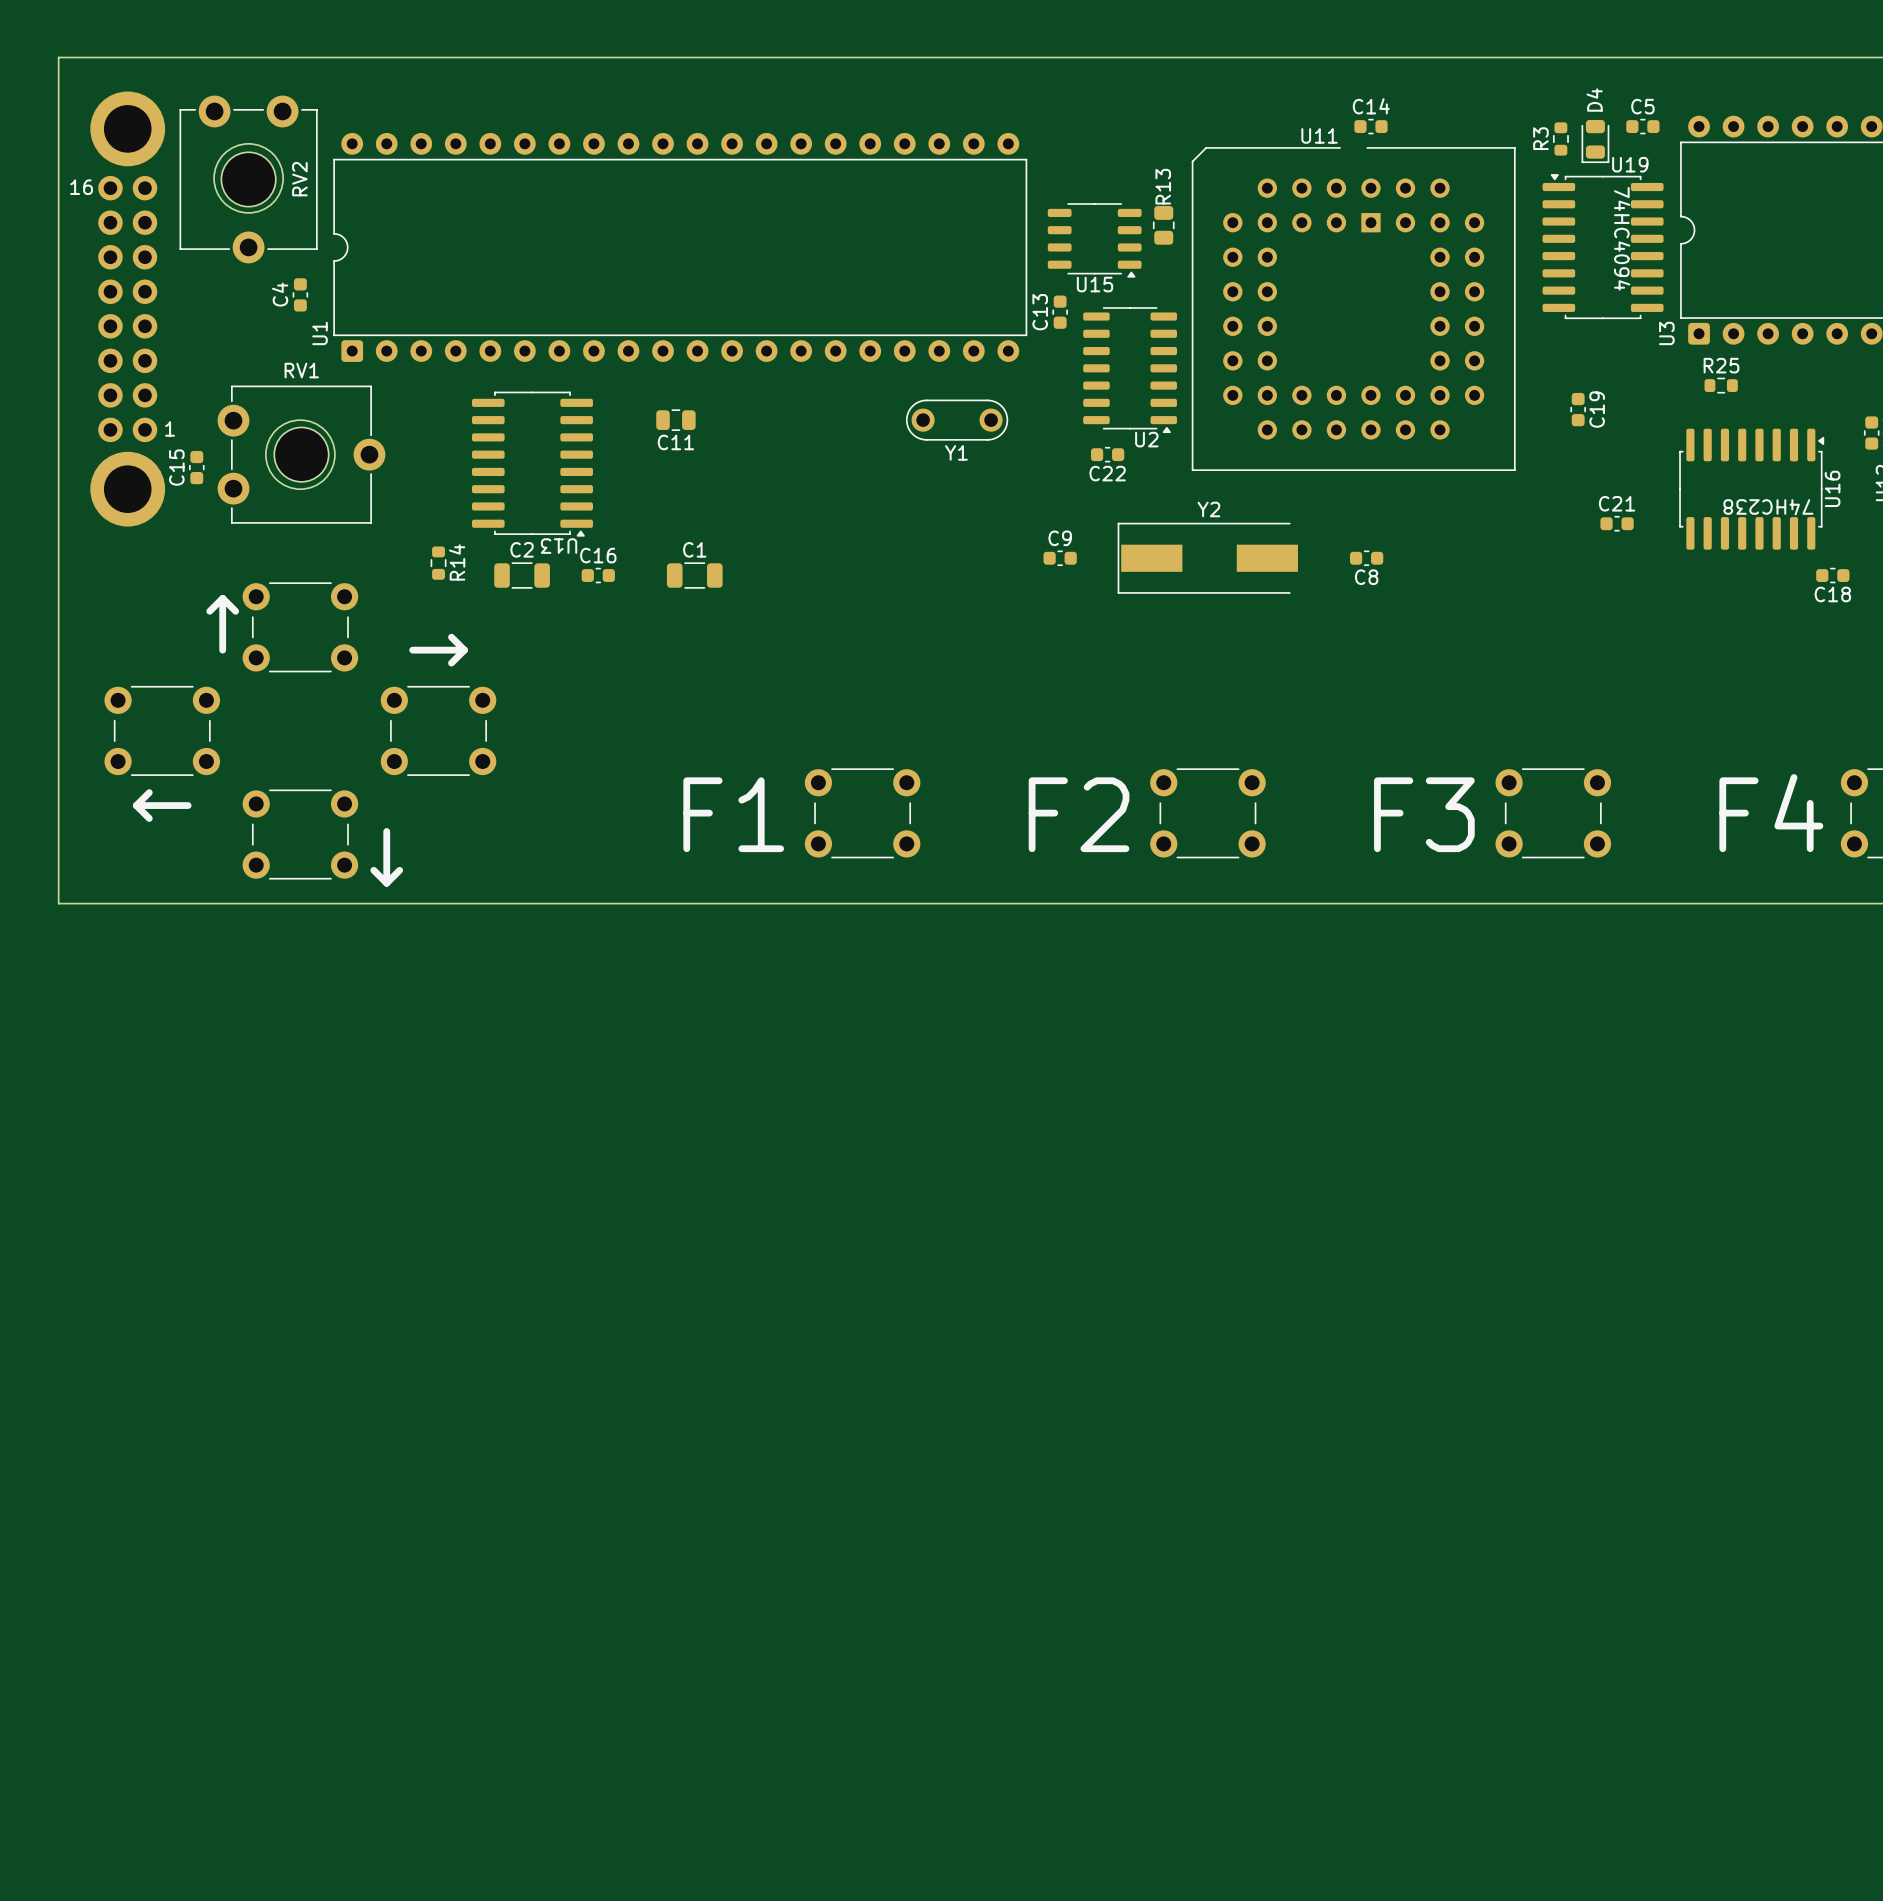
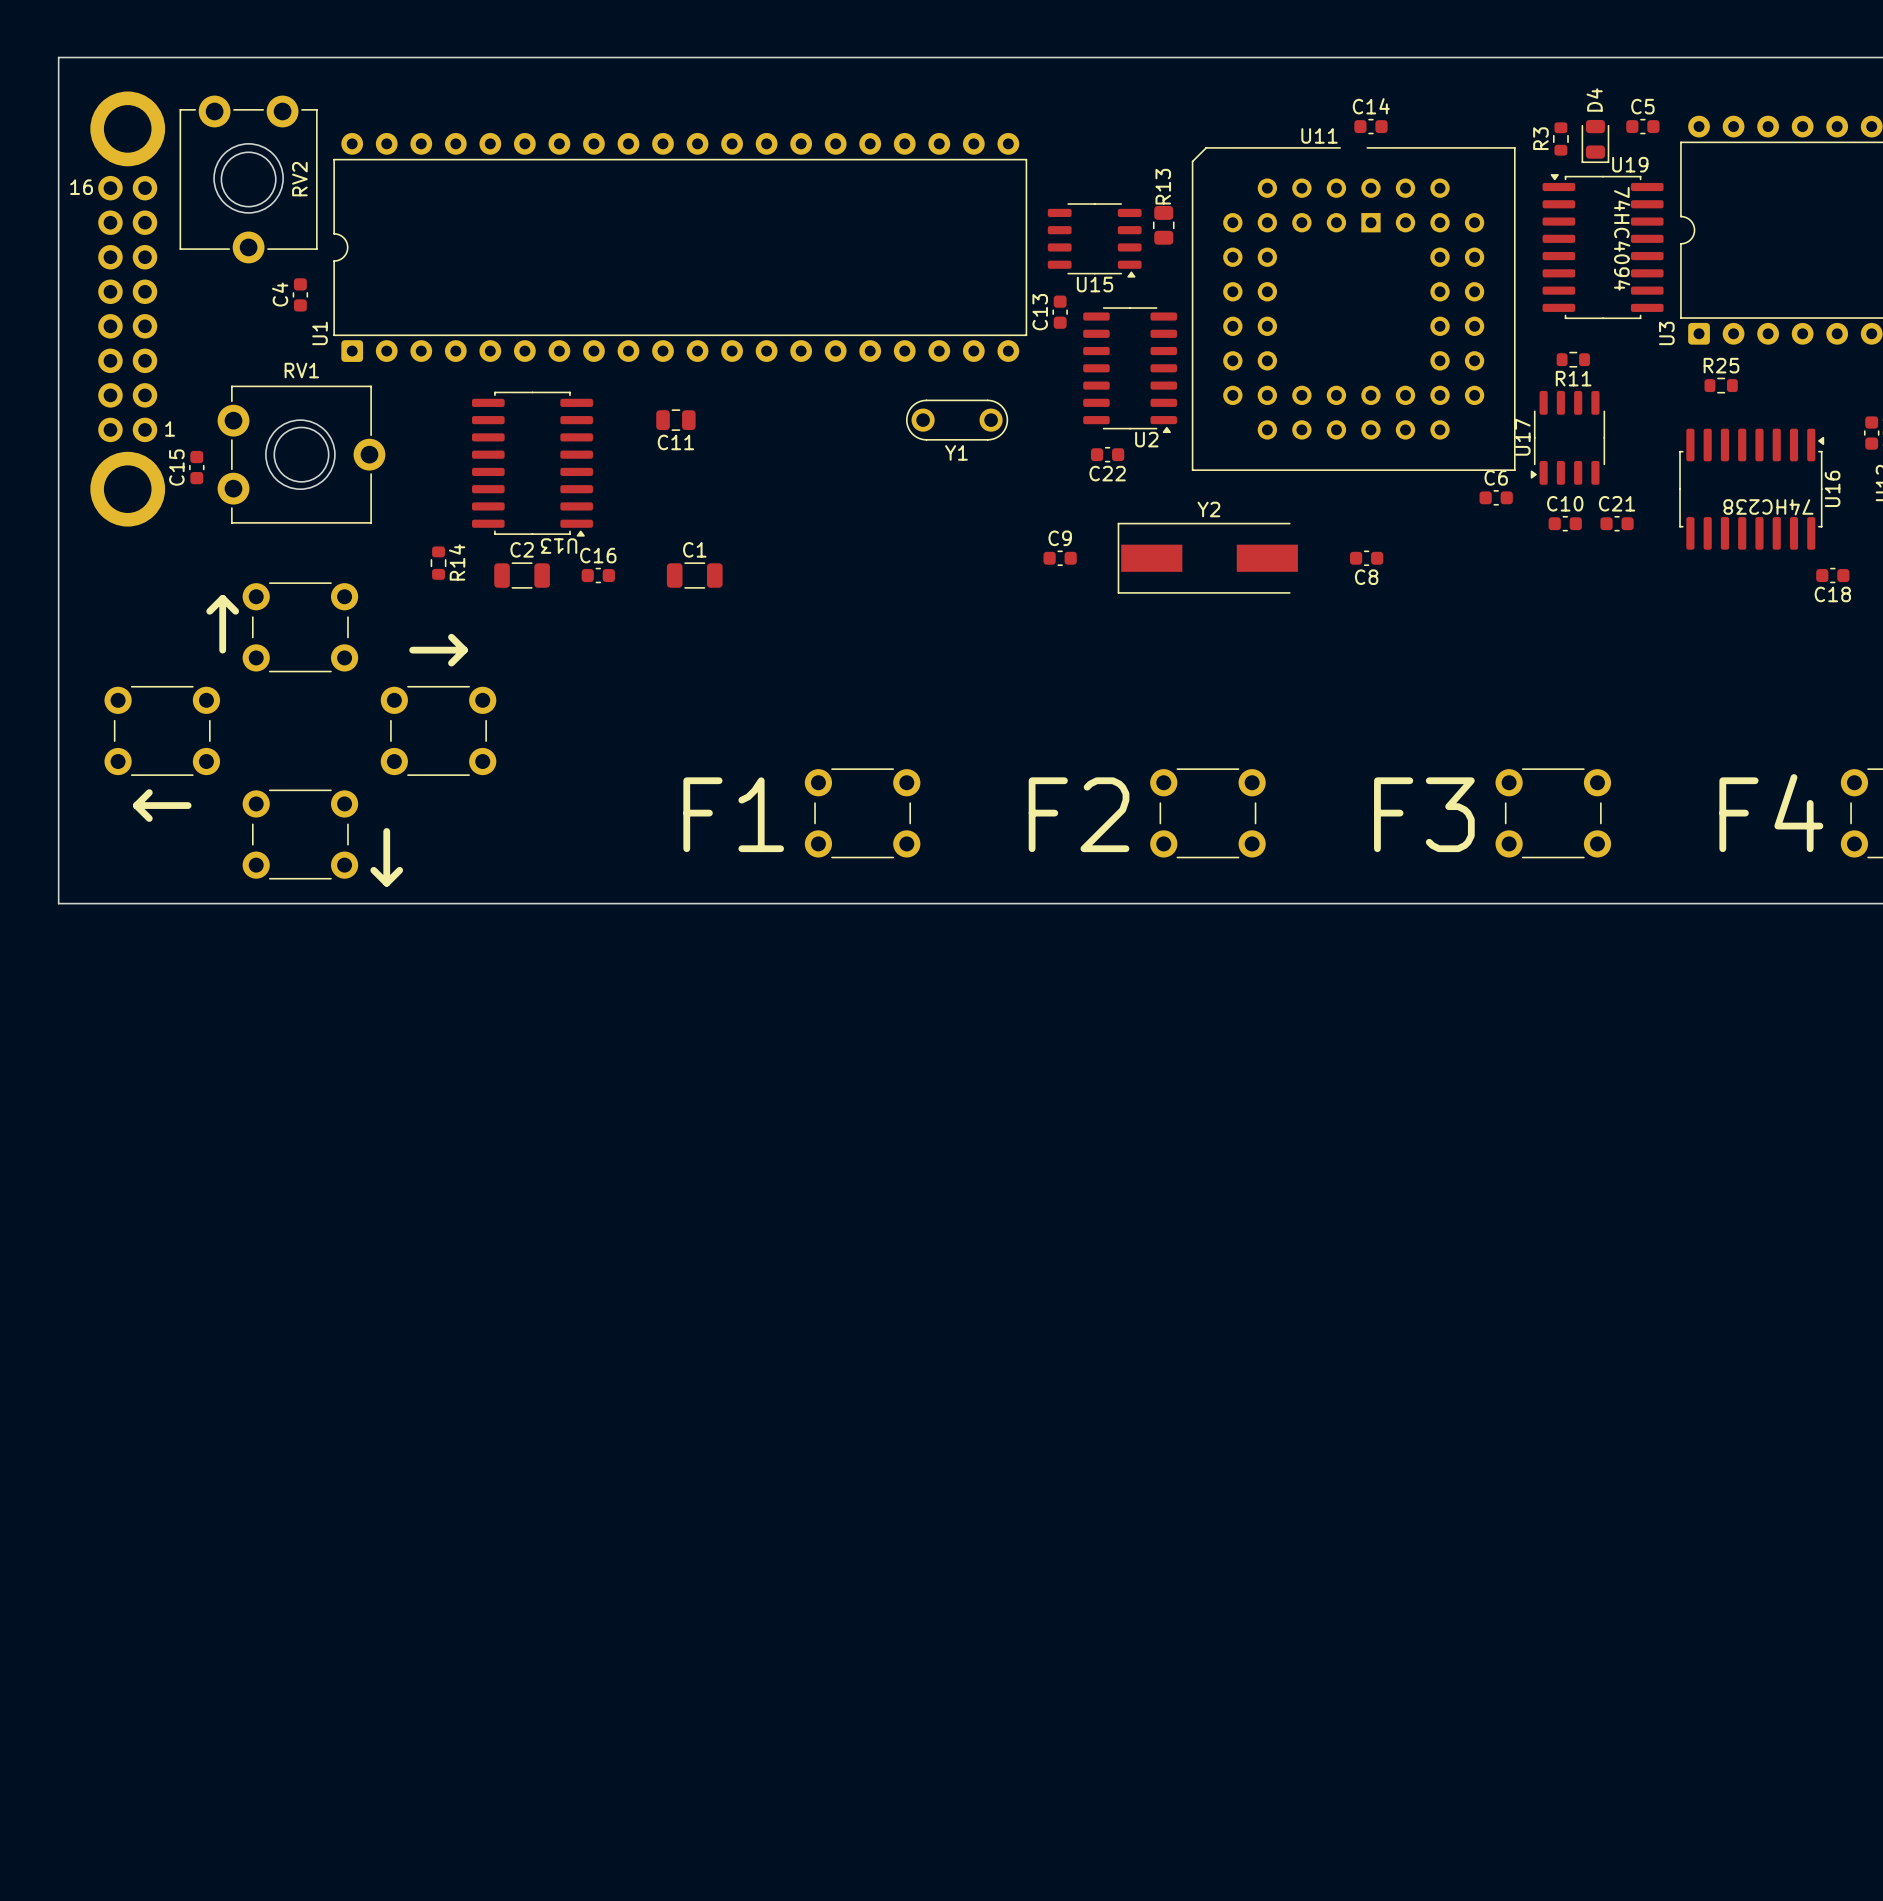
R11: none -> (1573, 359)
C19: (1578, 409) -> none
U17: none -> (1567, 437)
C6: none -> (1496, 497)
C10: none -> (1565, 523)

